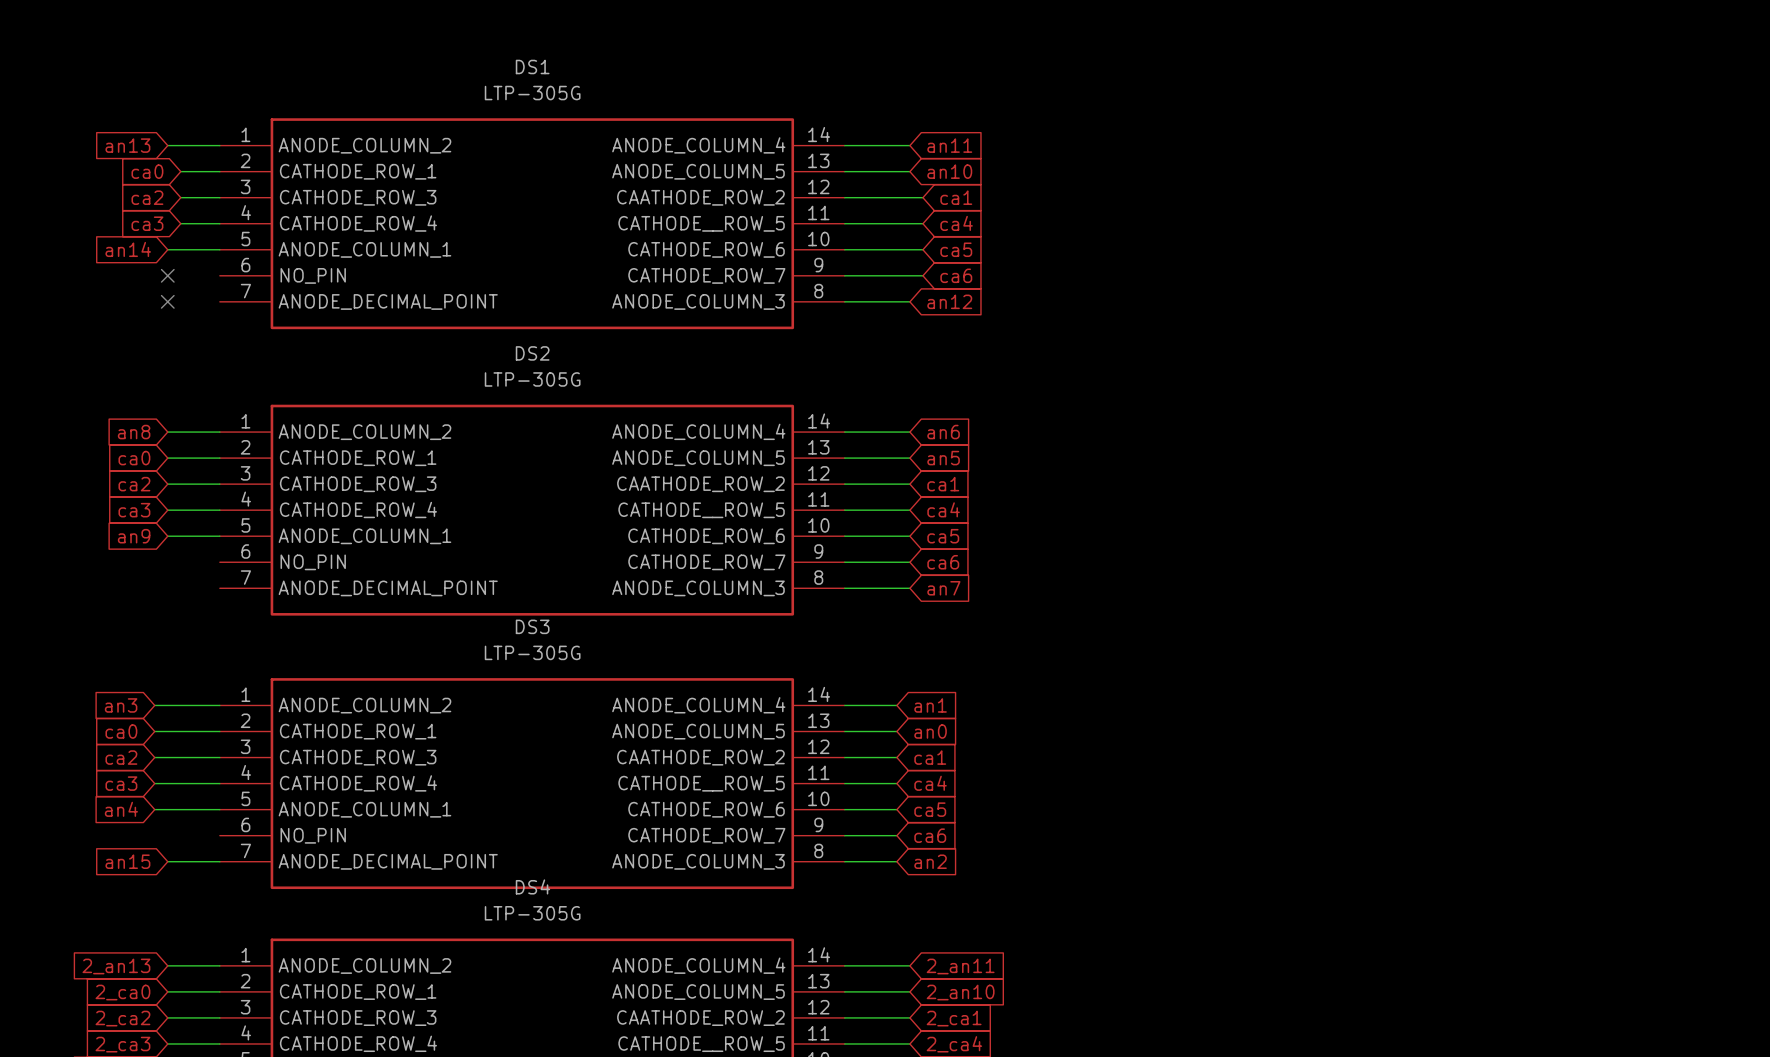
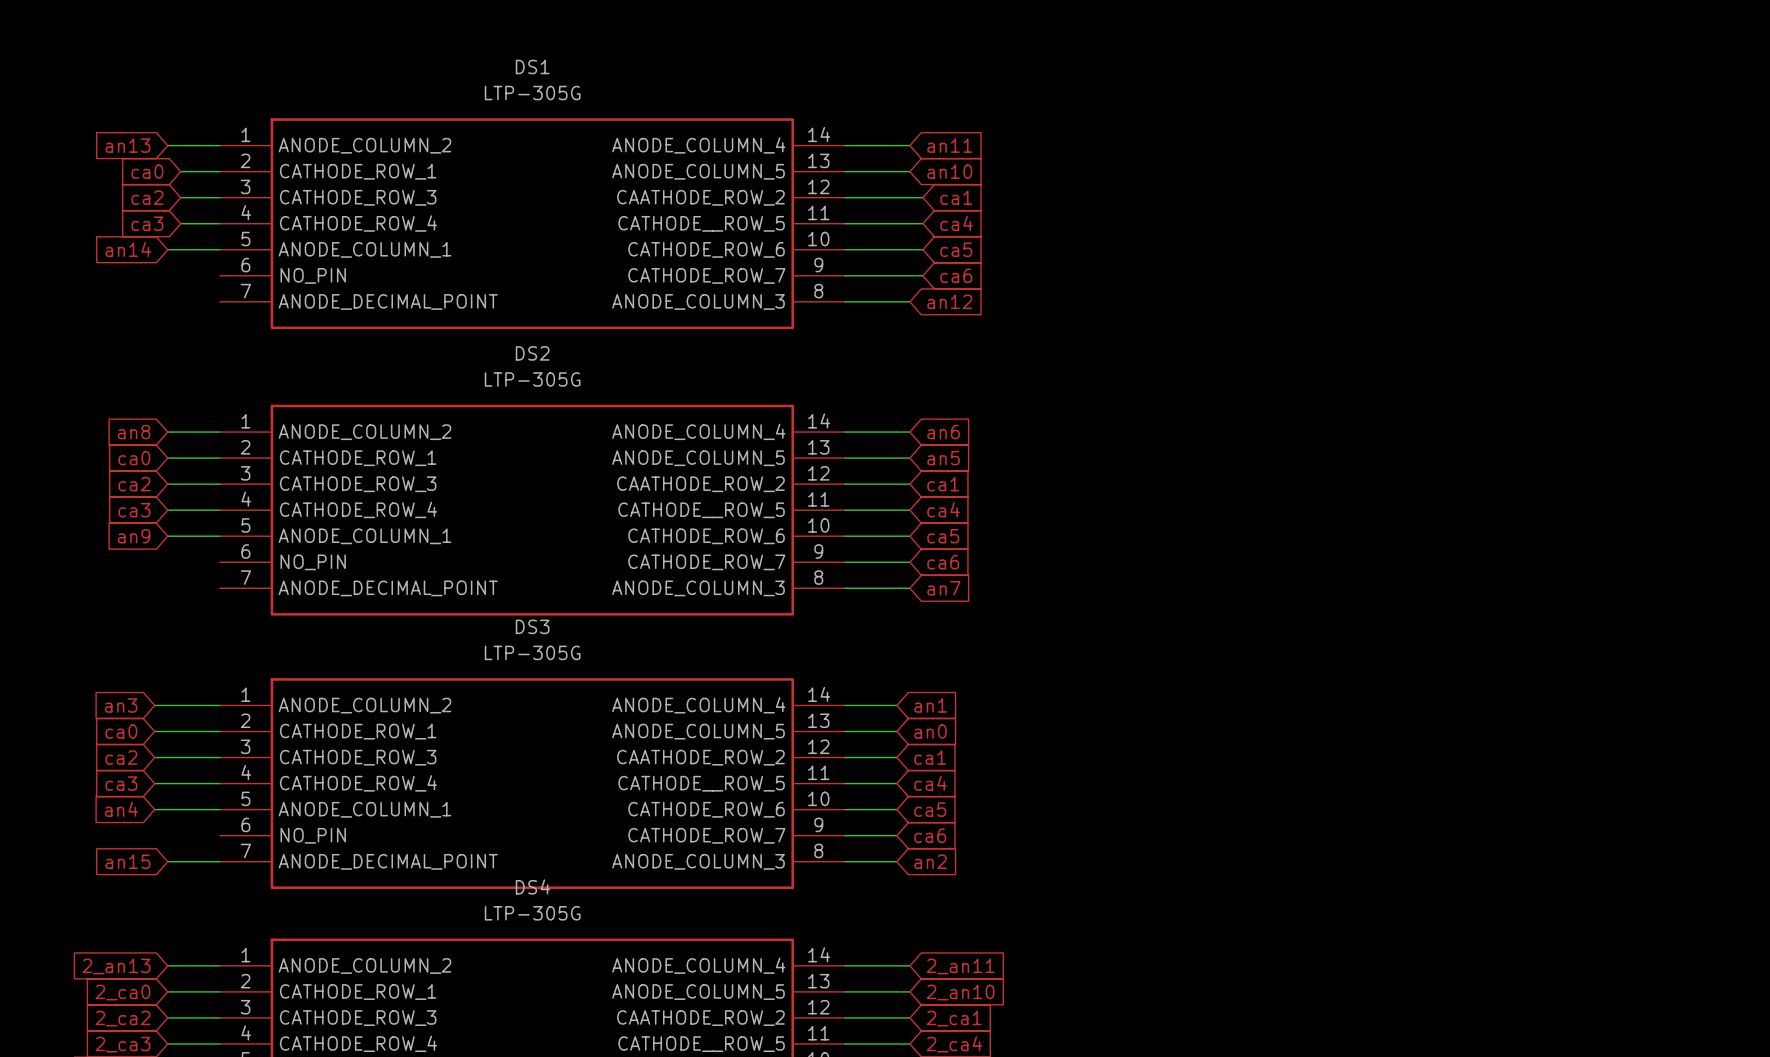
no-connect mark: (167, 275) -> none
no-connect mark: (167, 301) -> none

